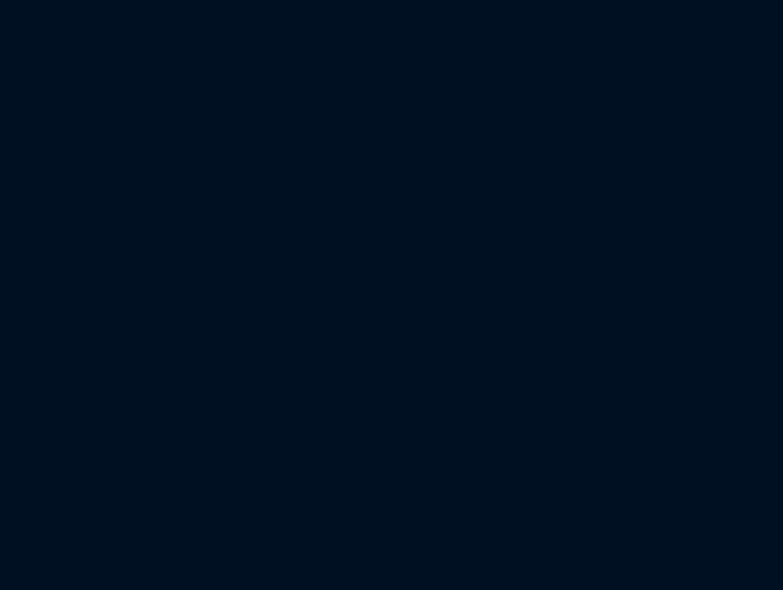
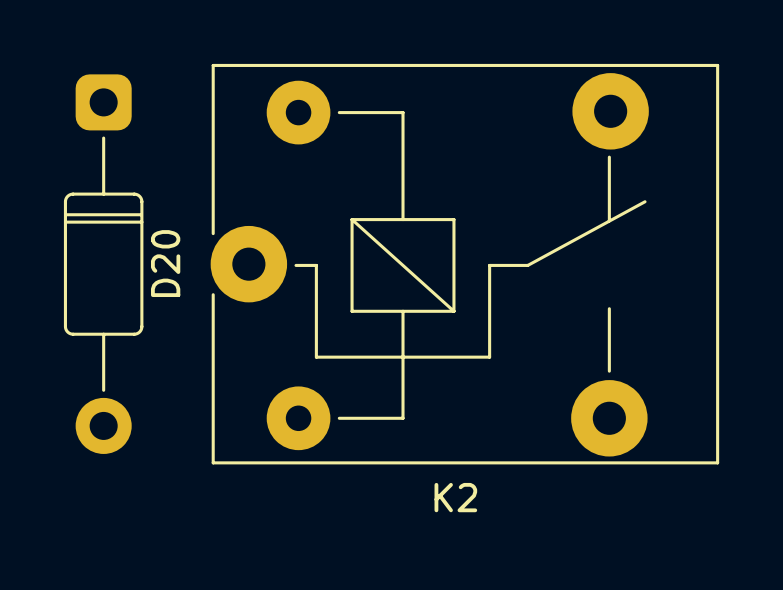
D20: none -> (103, 264)
K2: none -> (464, 264)

